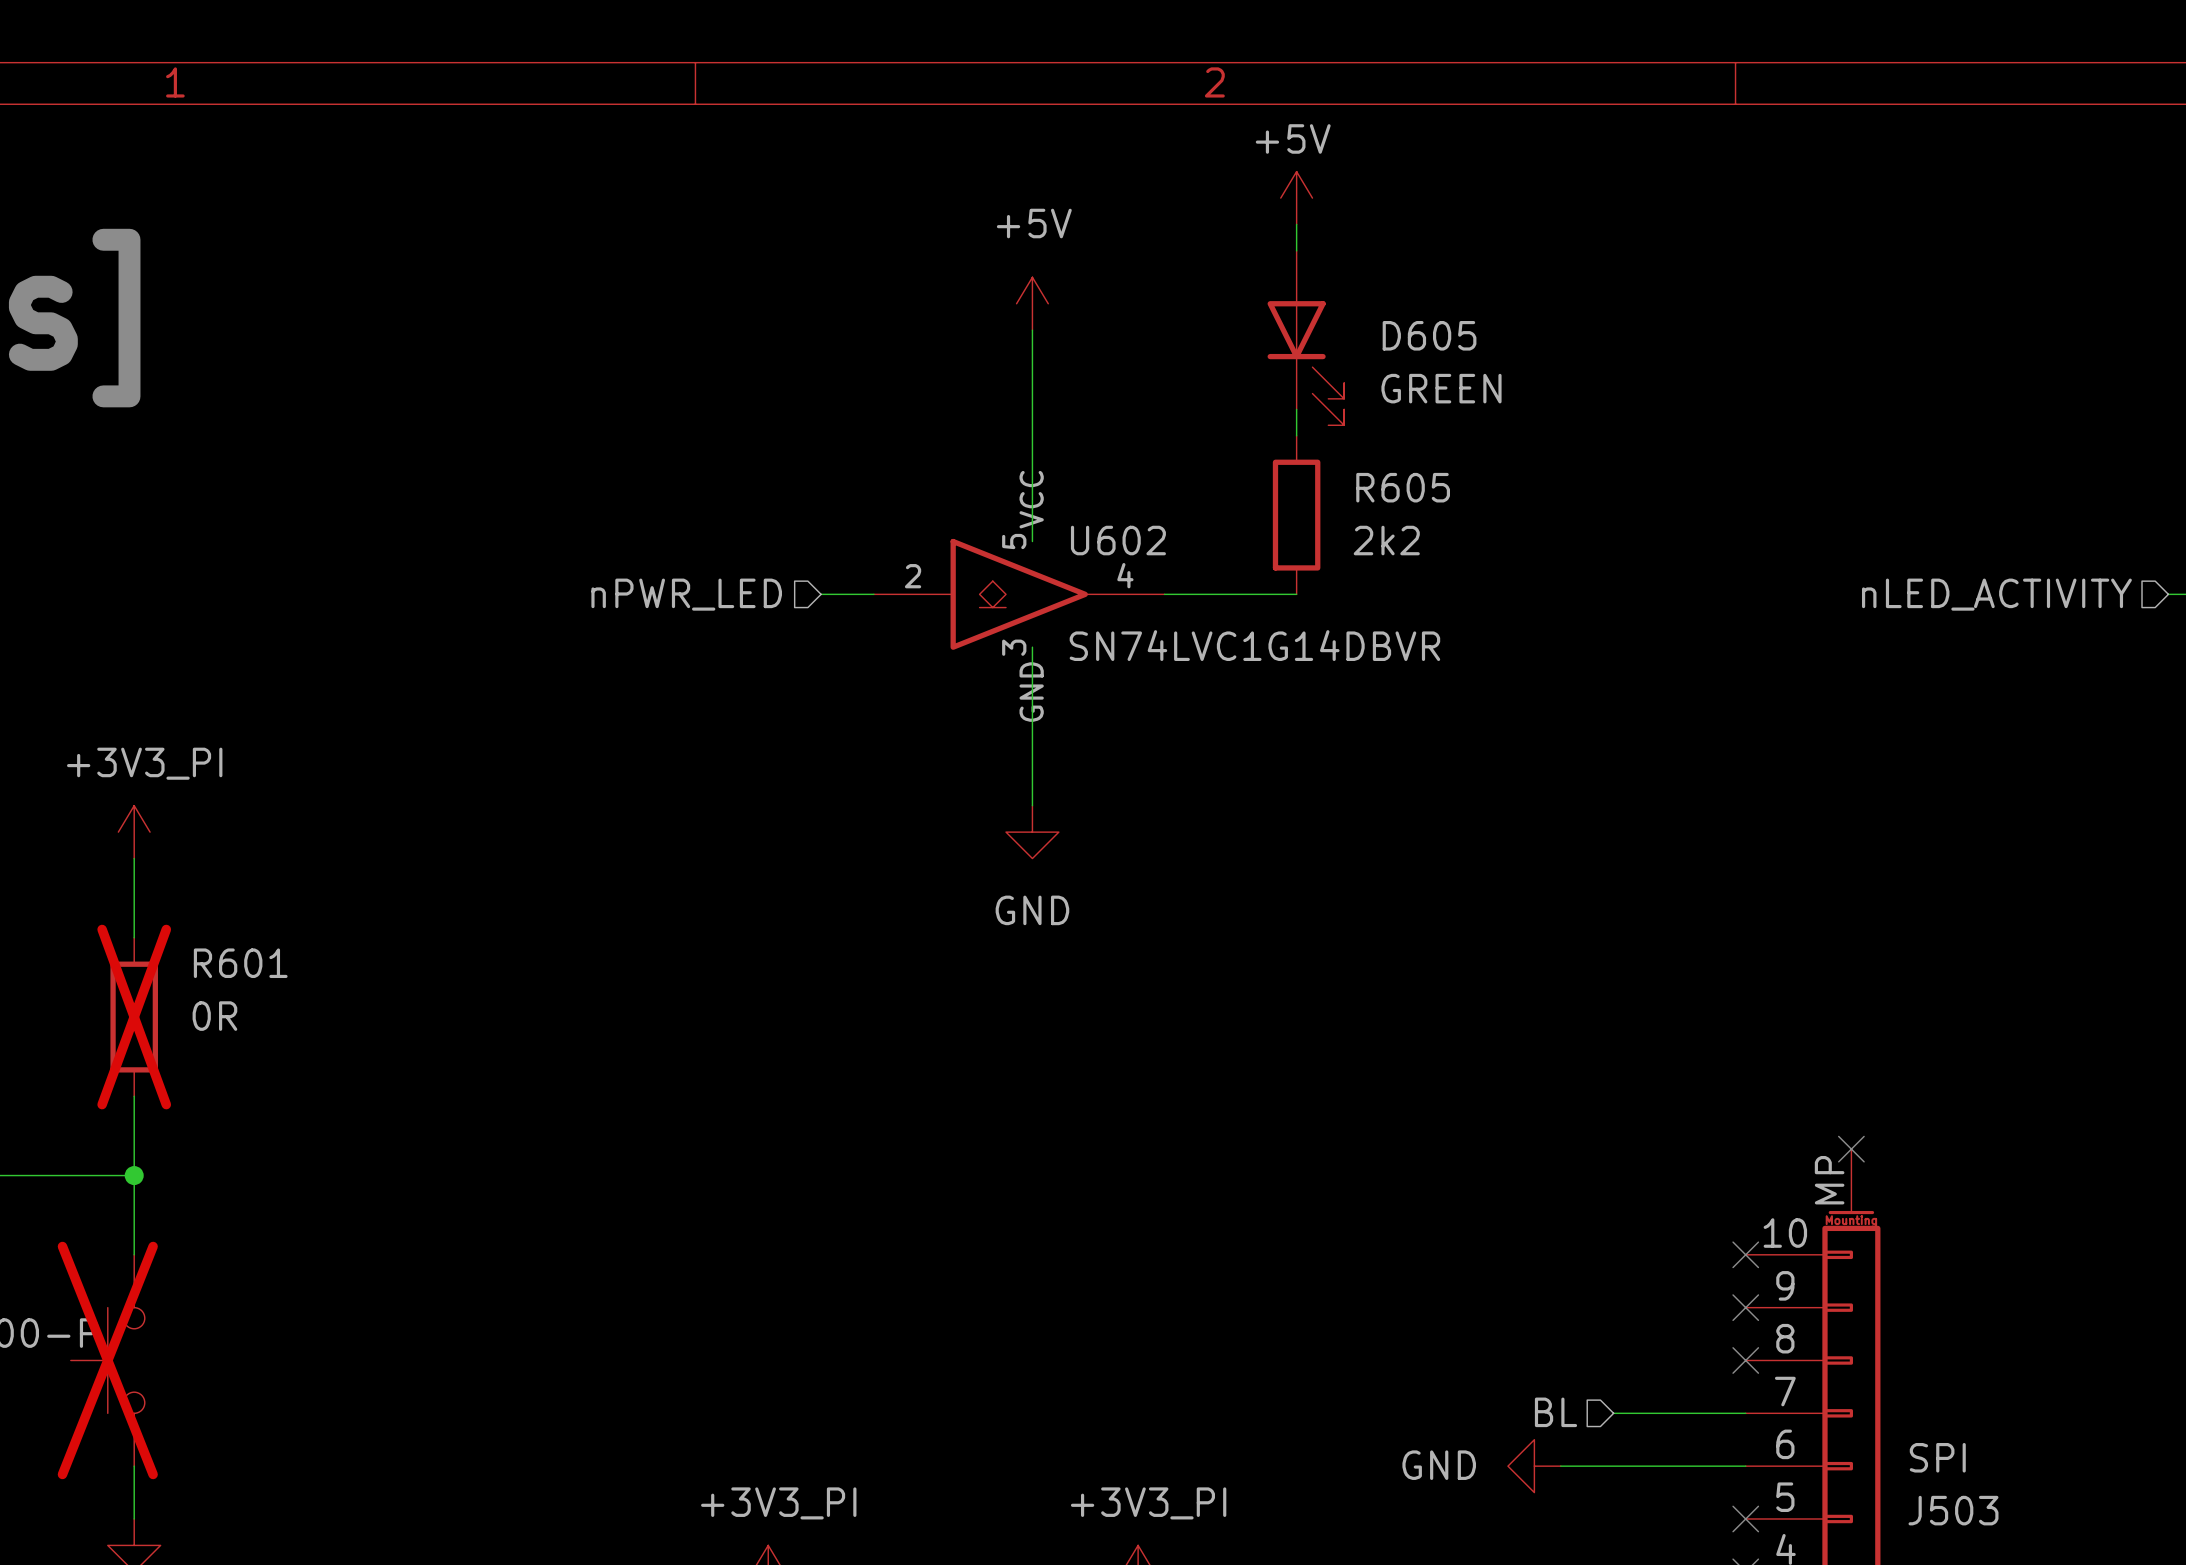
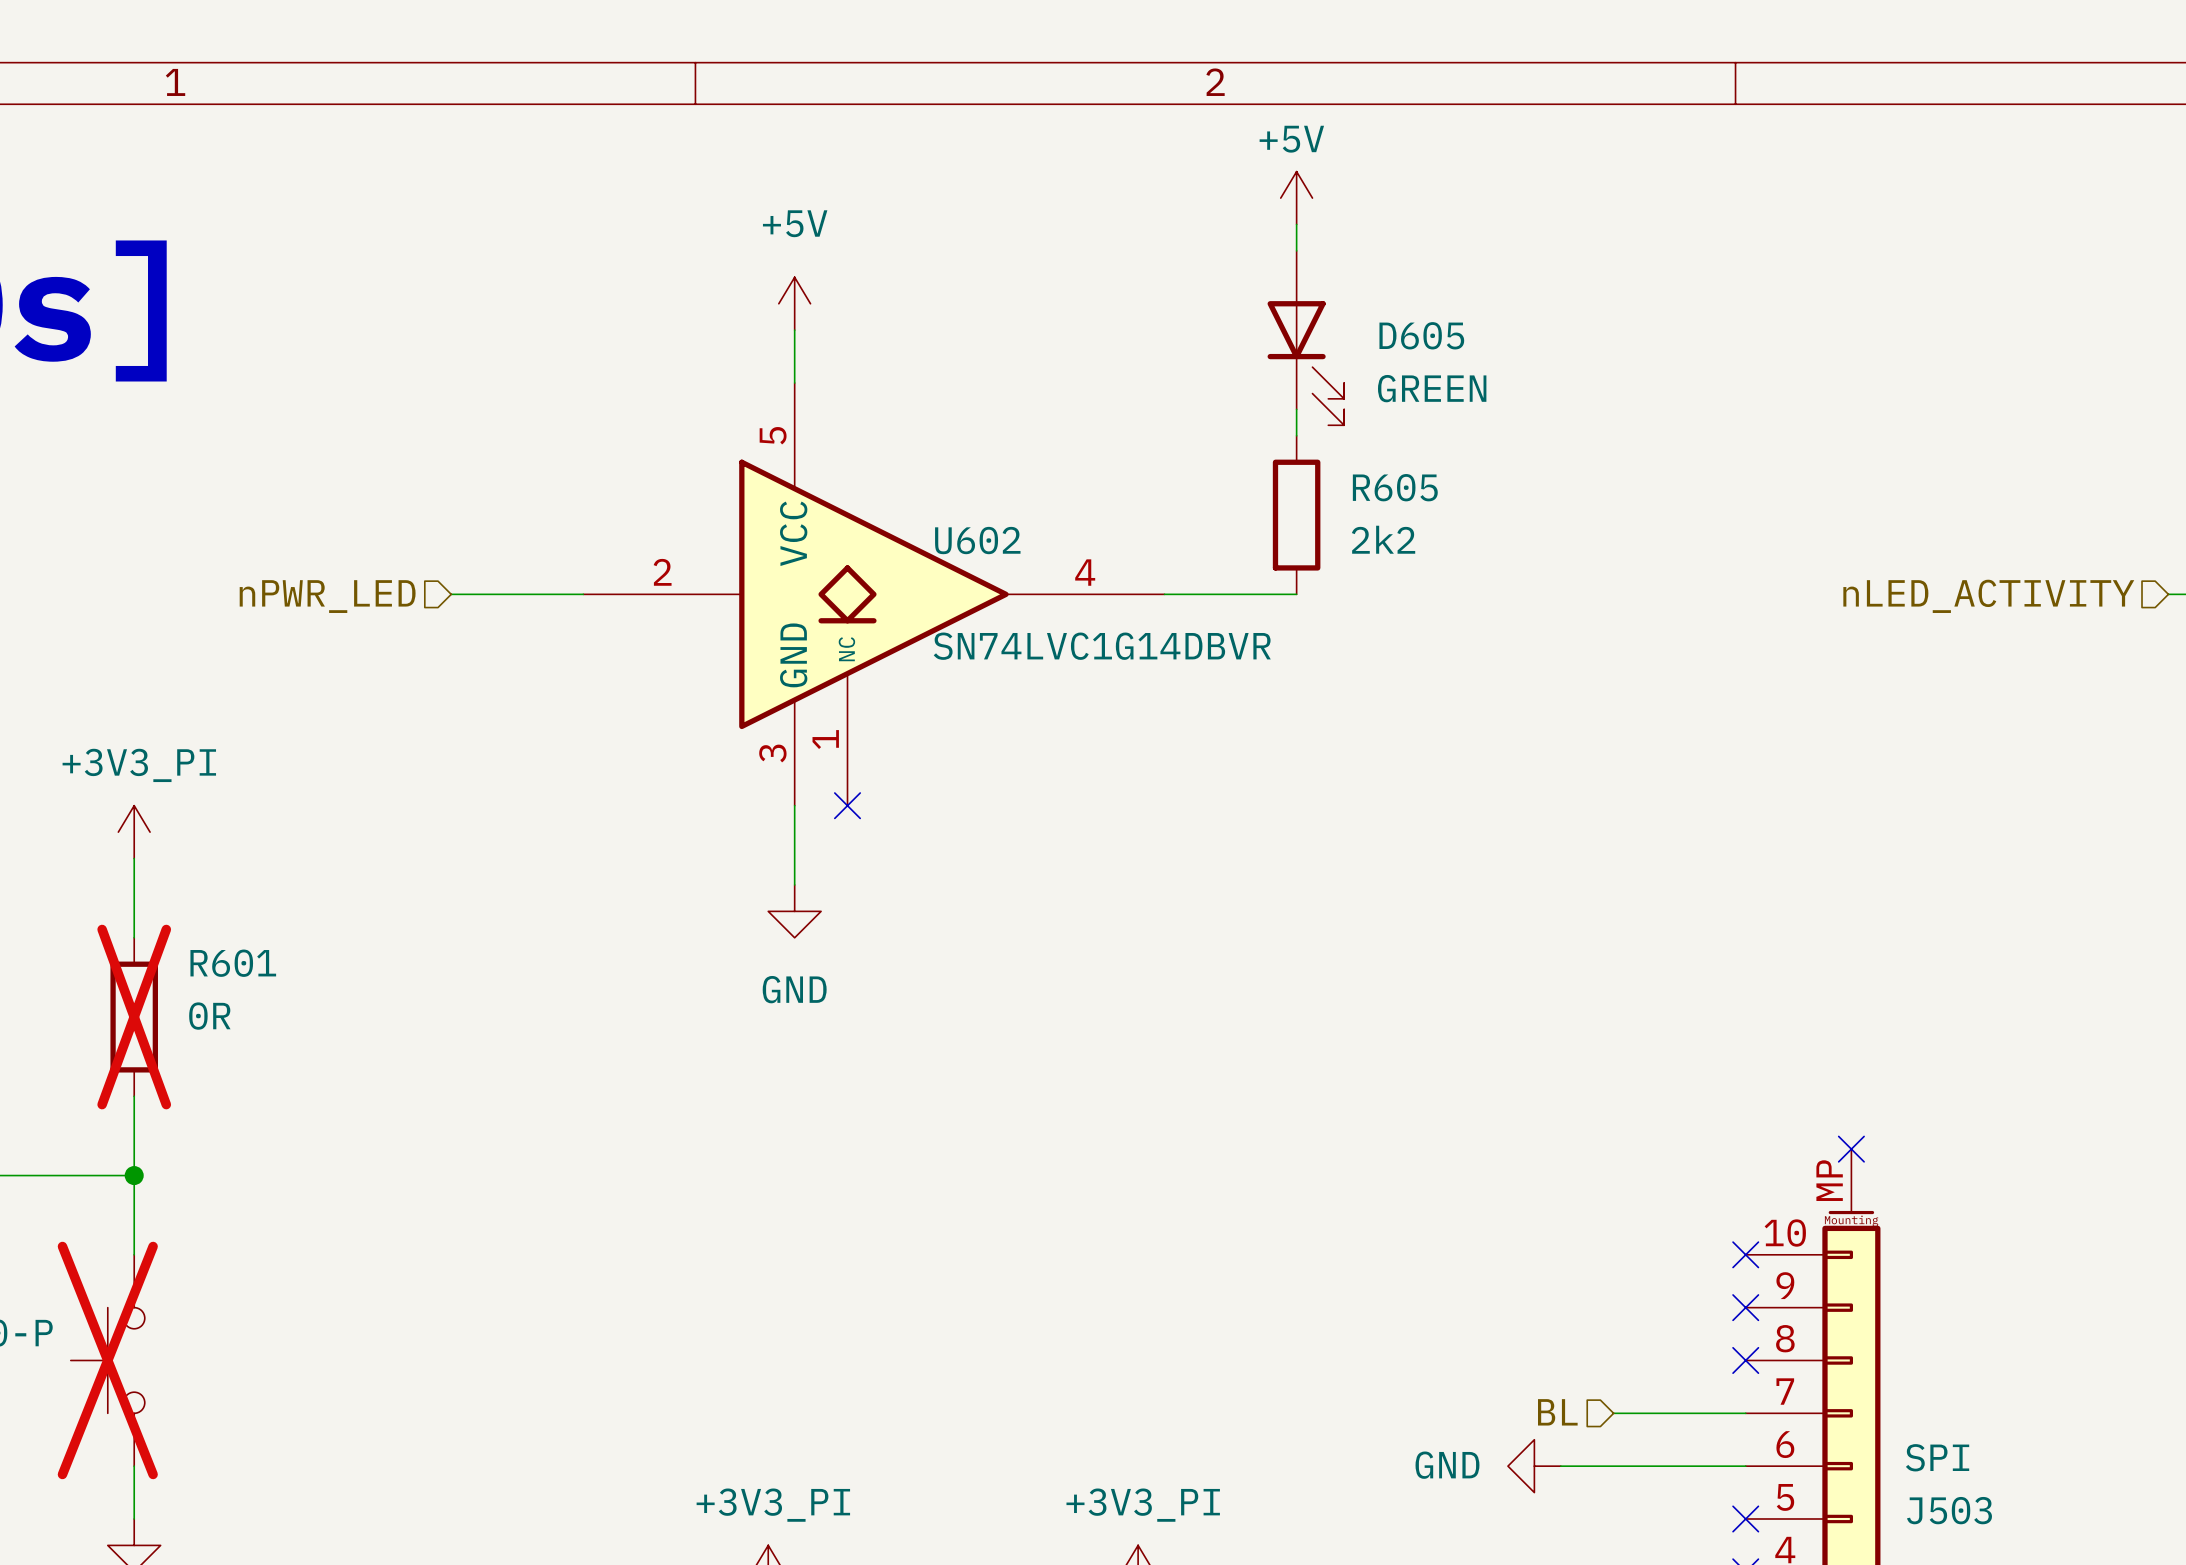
power symbol position: +5V (1032, 303) -> +5V (794, 303)
wire: none -> (794, 330) (794, 383)
wire: (1032, 330) (1032, 541) -> none
U602 symbol: [873, 538, 1165, 650] -> [583, 383, 1165, 806]
wire: none -> (451, 594) (583, 594)
hierarchical label position: nPWR_LED (686, 594) -> nPWR_LED (327, 596)
wire: (1032, 647) (1032, 805) -> none
wire: none -> (794, 805) (794, 884)
no-connect mark: none -> (847, 805)
power symbol position: GND (1032, 832) -> GND (794, 911)

